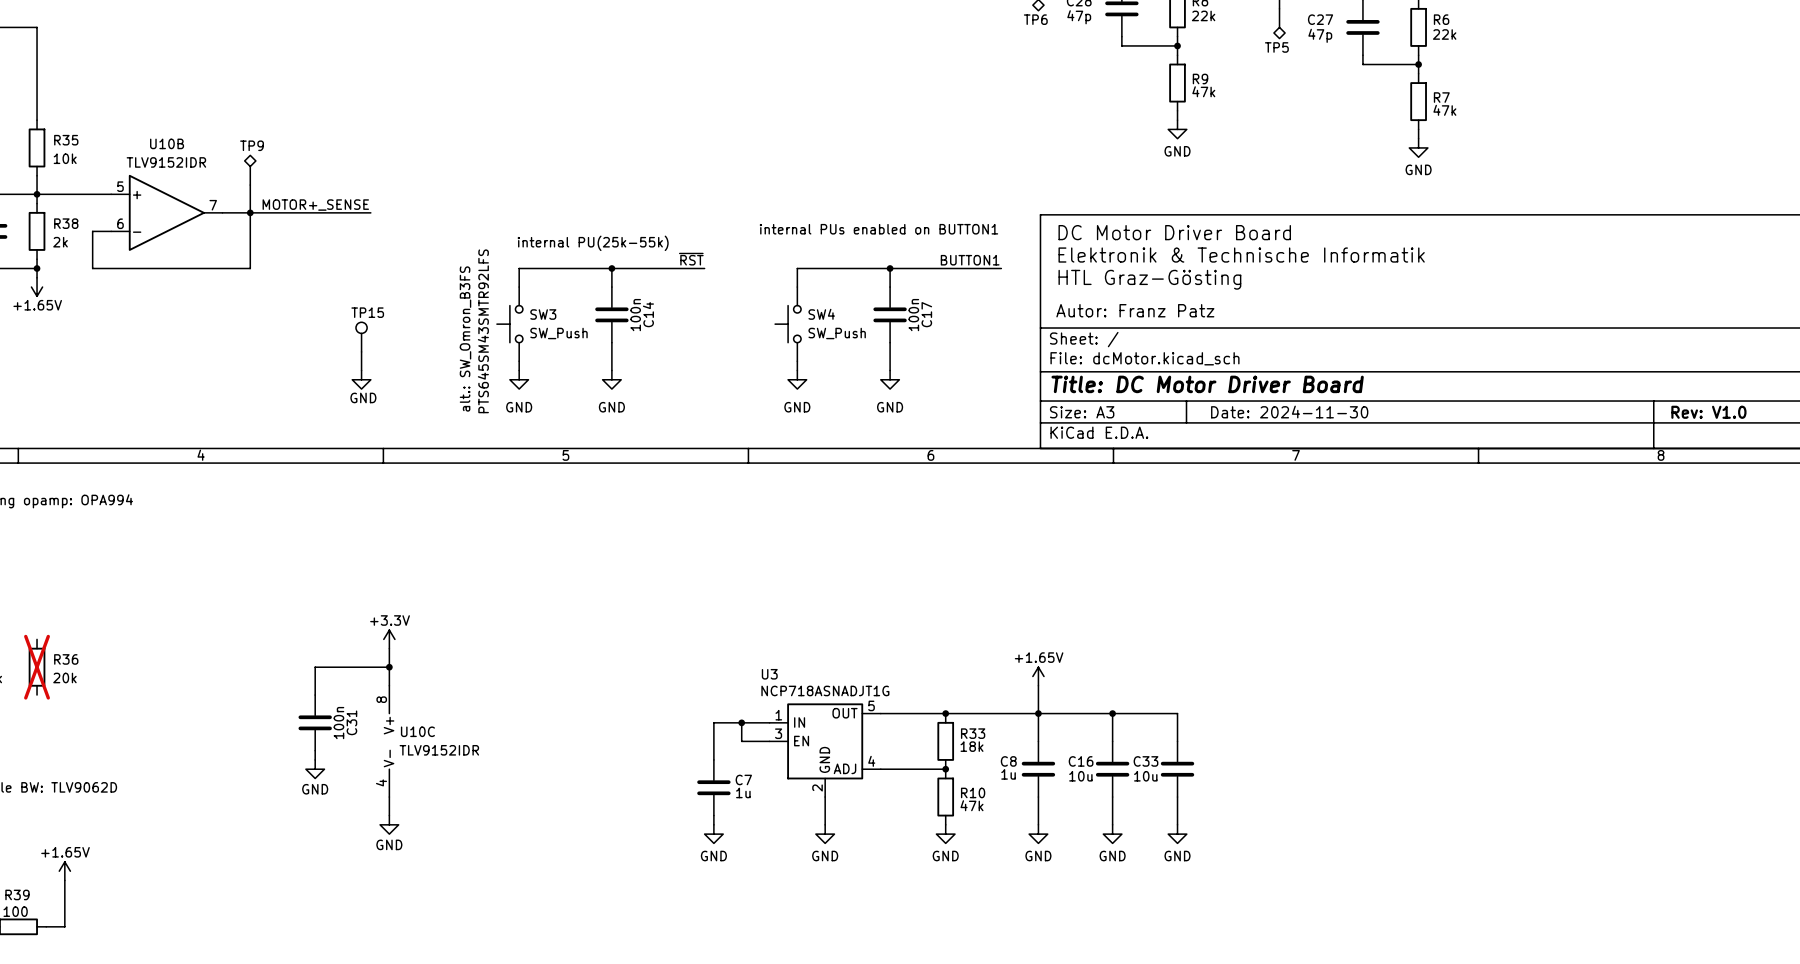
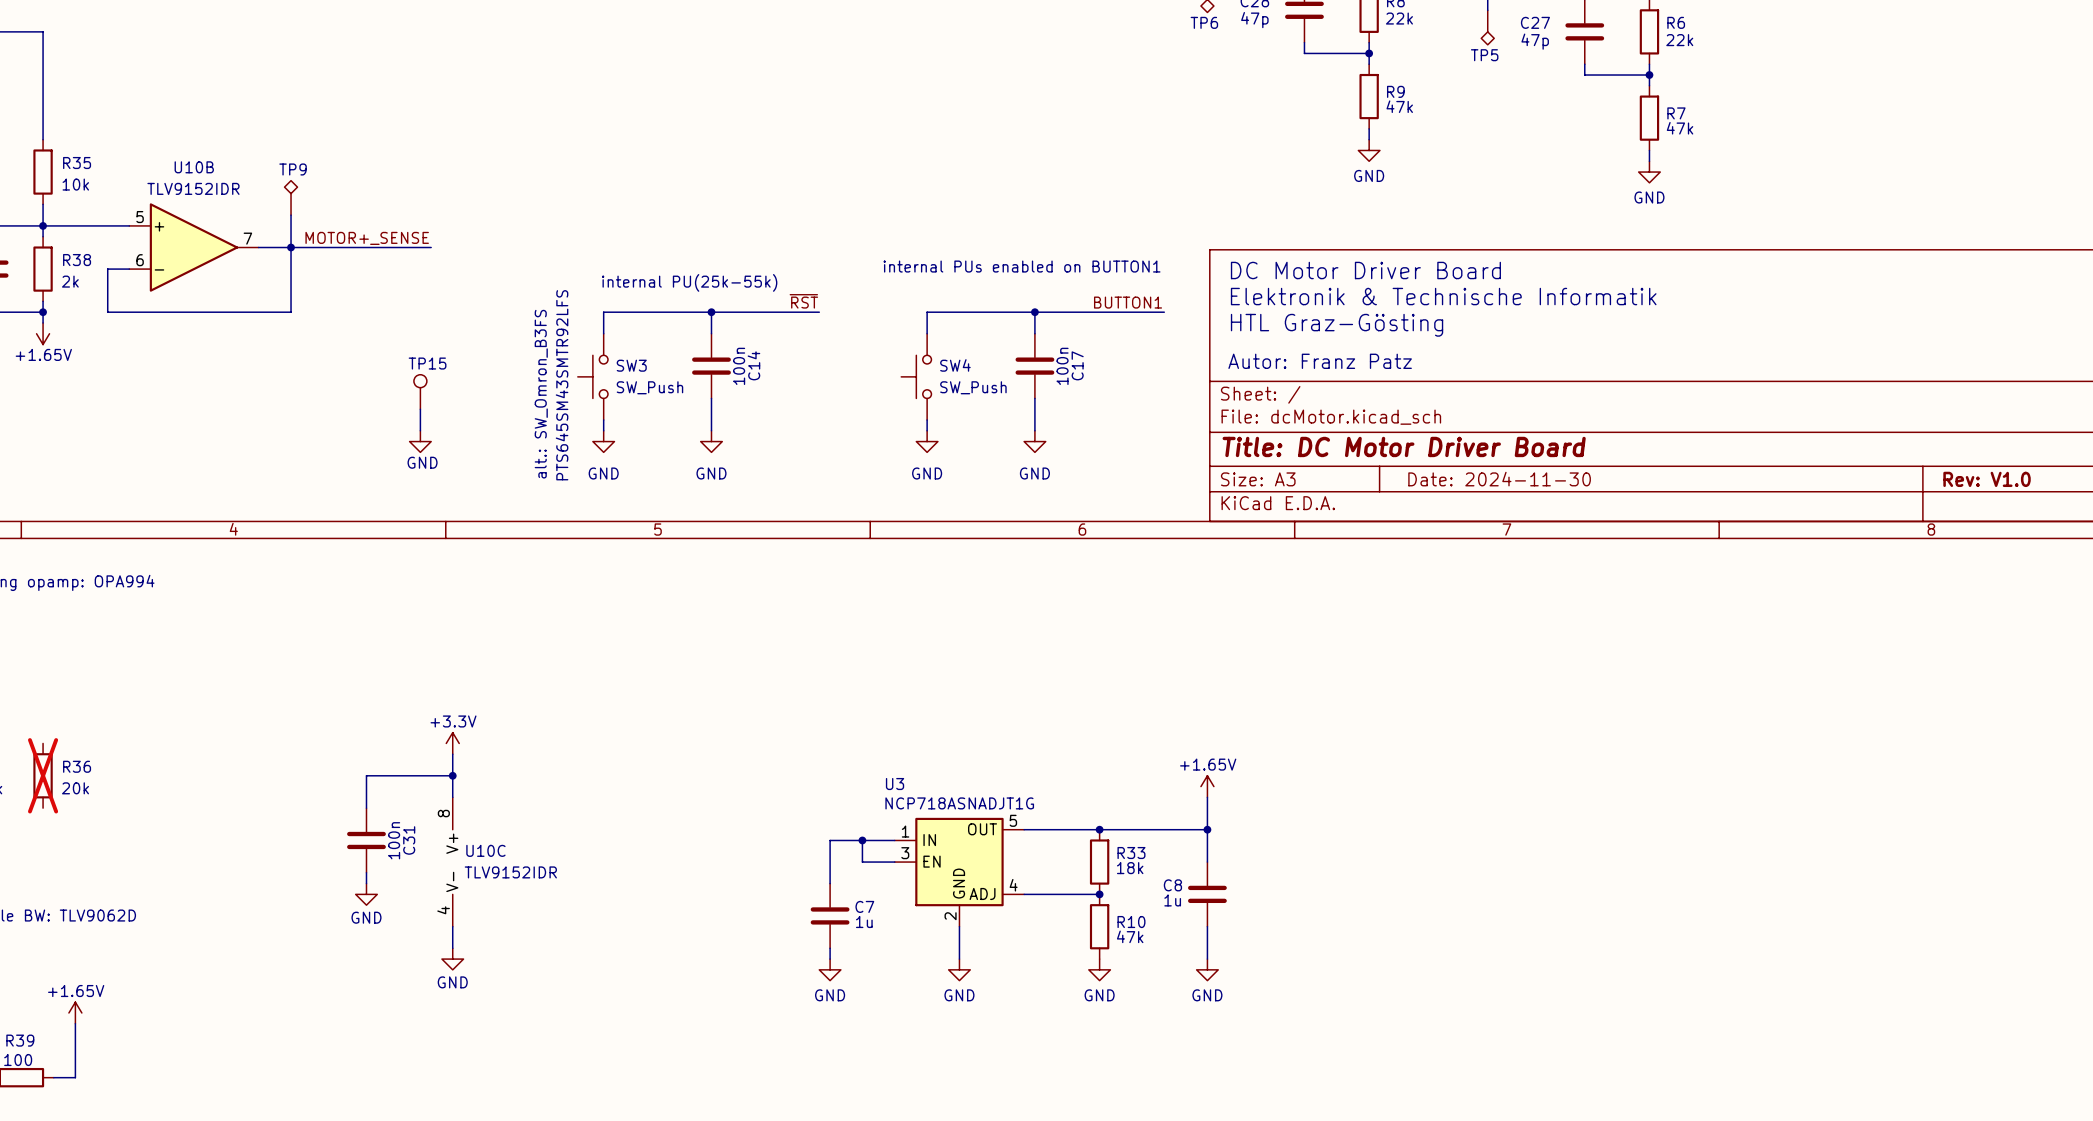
wire: (1038, 713) (1177, 713) (1177, 741) -> none
wire: (1112, 713) (1112, 741) -> none
junction: (1112, 713) -> none
C16: 10u (1112, 769) -> none
C33: 10u (1177, 769) -> none
wire: (1112, 797) (1112, 824) -> none
wire: (1177, 797) (1177, 824) -> none
power symbol: GND (1112, 834) -> none
power symbol: GND (1177, 834) -> none

